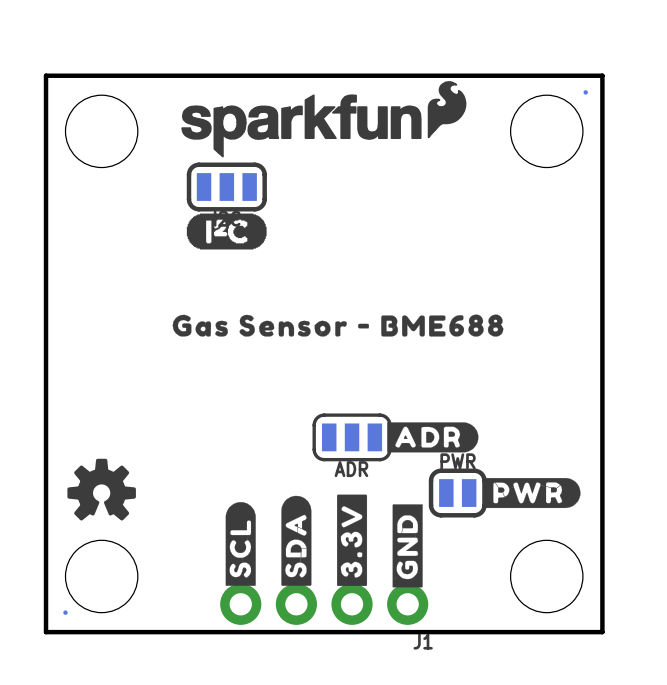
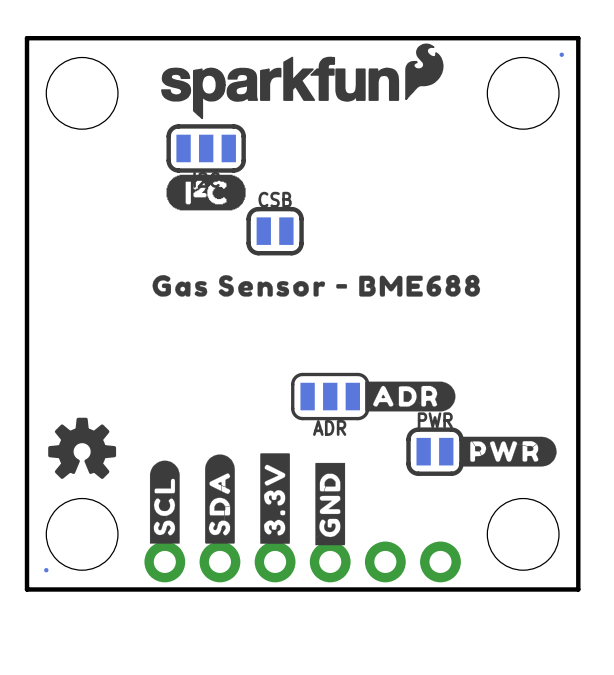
CSB: none -> (275, 231)
drawing position: (296, 540) -> (219, 499)
drawing position: (352, 540) -> (275, 498)
drawing position: (240, 543) -> (164, 502)
drawing position: (407, 545) -> (330, 504)
J1: (324, 604) -> none
part: none -> (302, 561)

